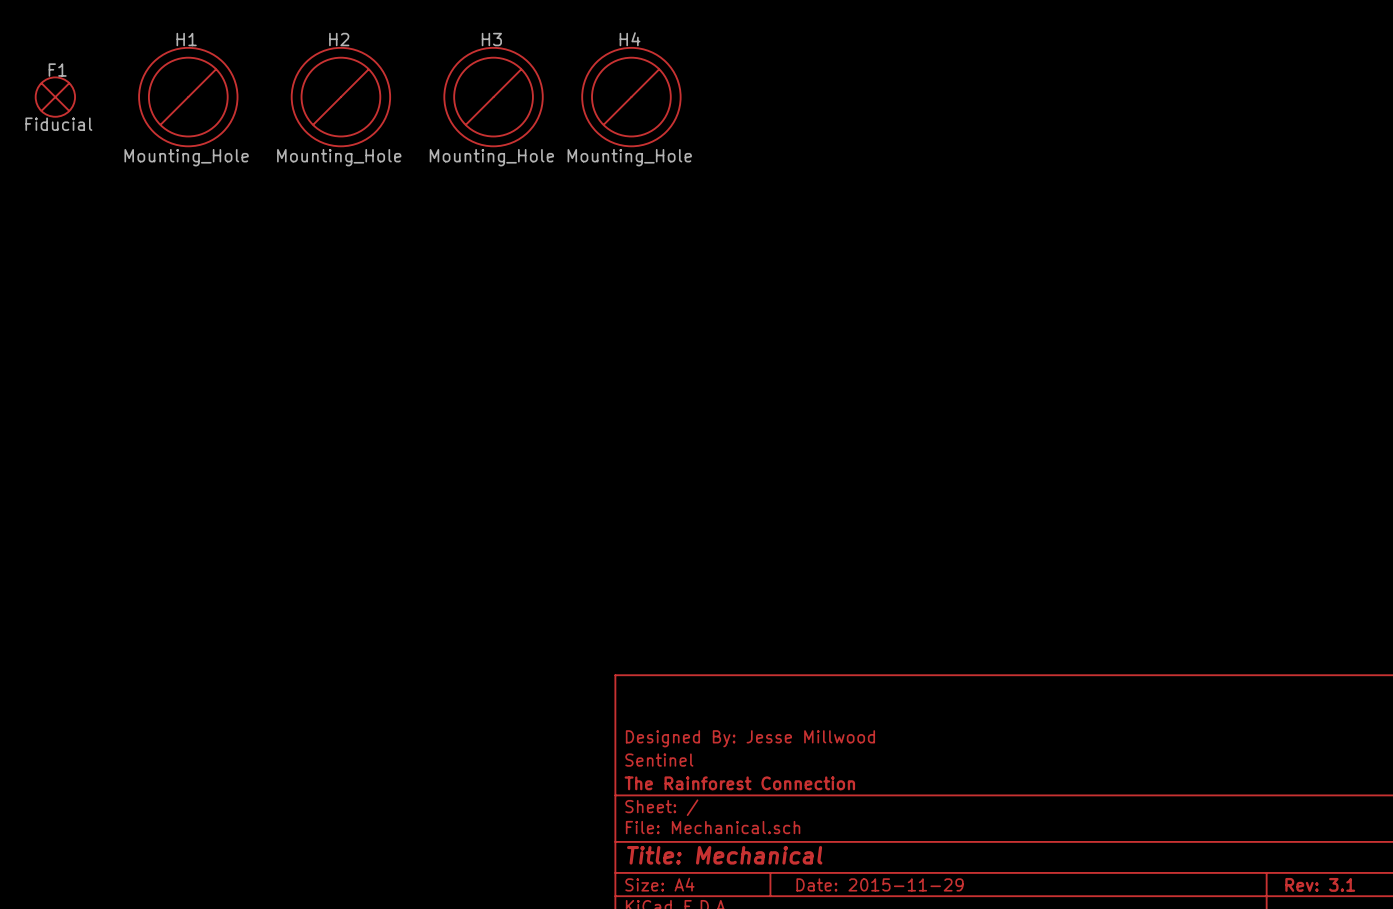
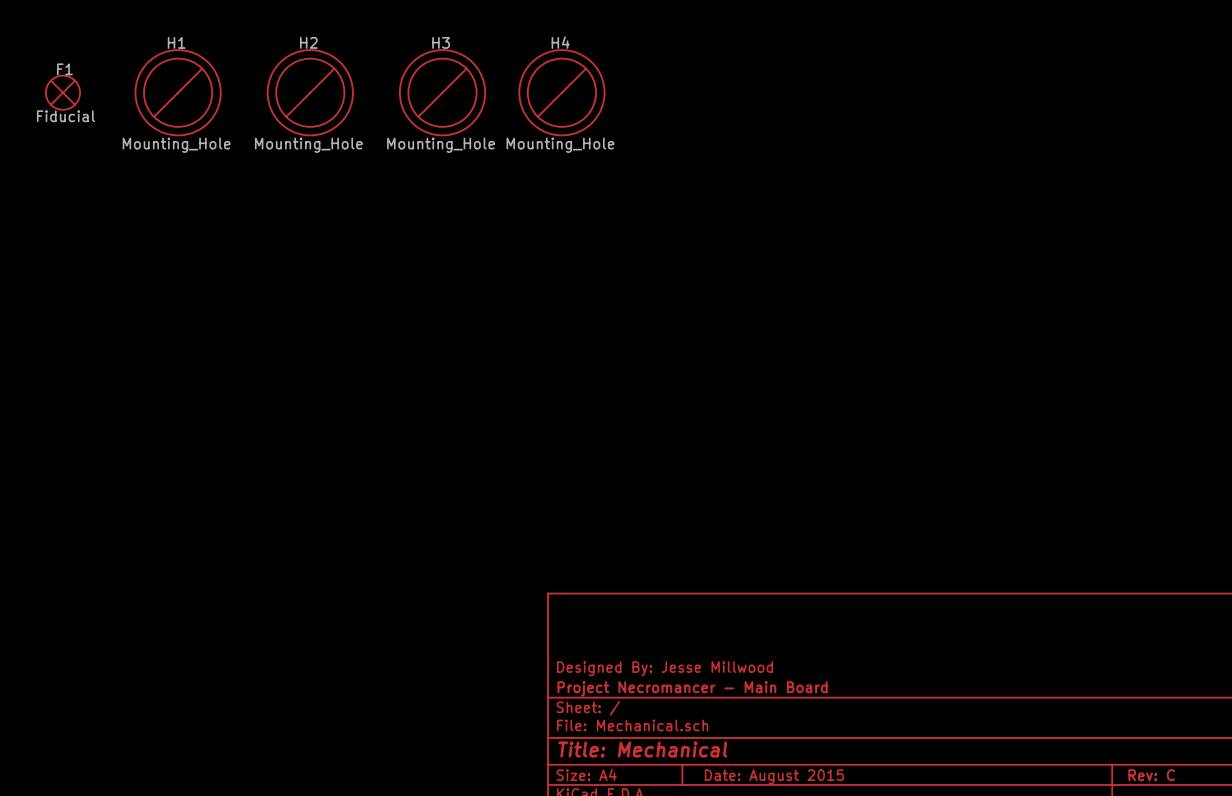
title block: Designed By: Jesse Millwood (750, 738) -> none
title block: Sentinel (659, 760) -> Designed By: Jesse Millwood (665, 668)
title block: The Rainforest Connection (739, 783) -> Project Necromancer - Main Board (692, 688)
title block: Date: 2015-11-29 (880, 884) -> Date: August 2015 (774, 776)
title block: Rev: 3.1 (1320, 884) -> Rev: C (1151, 775)

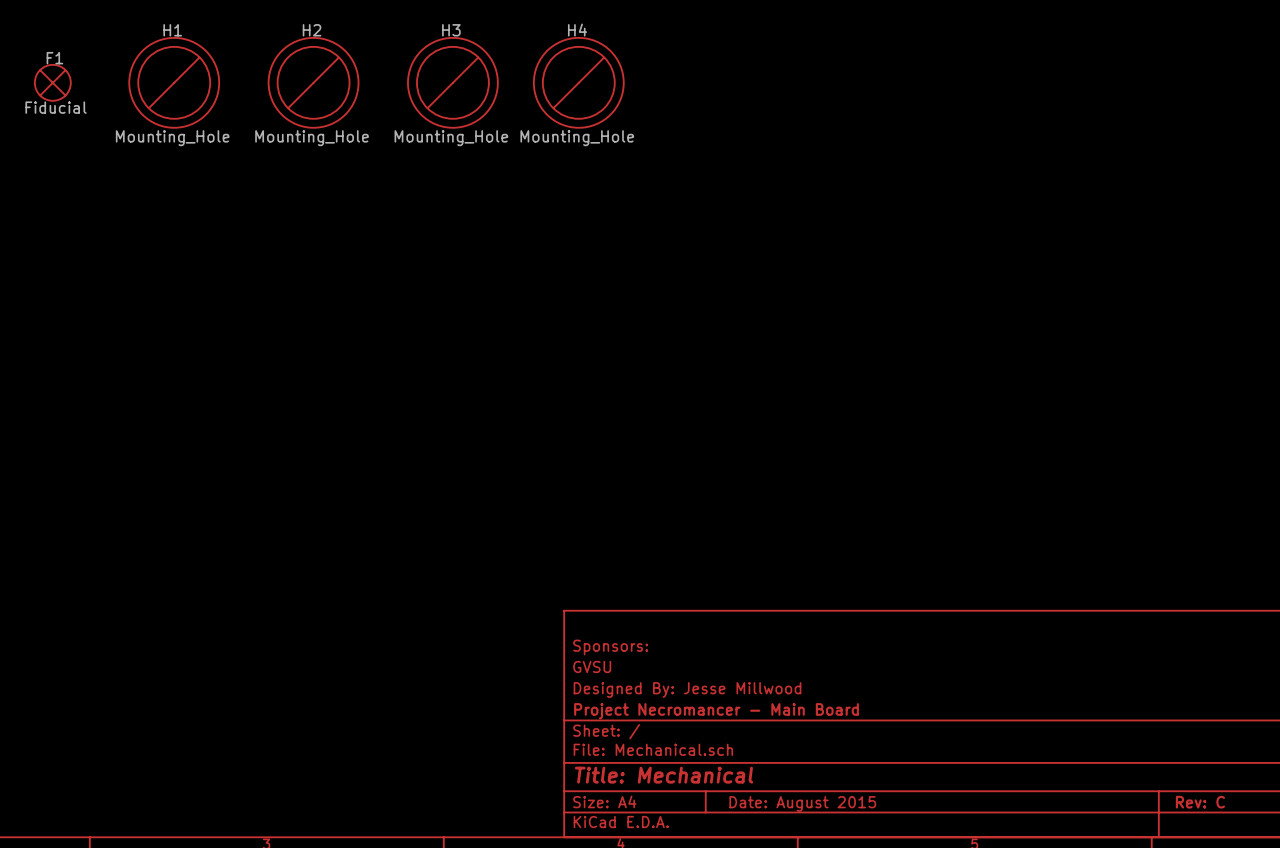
title block: none -> Sponsors: (610, 647)
title block: none -> GVSU (592, 666)

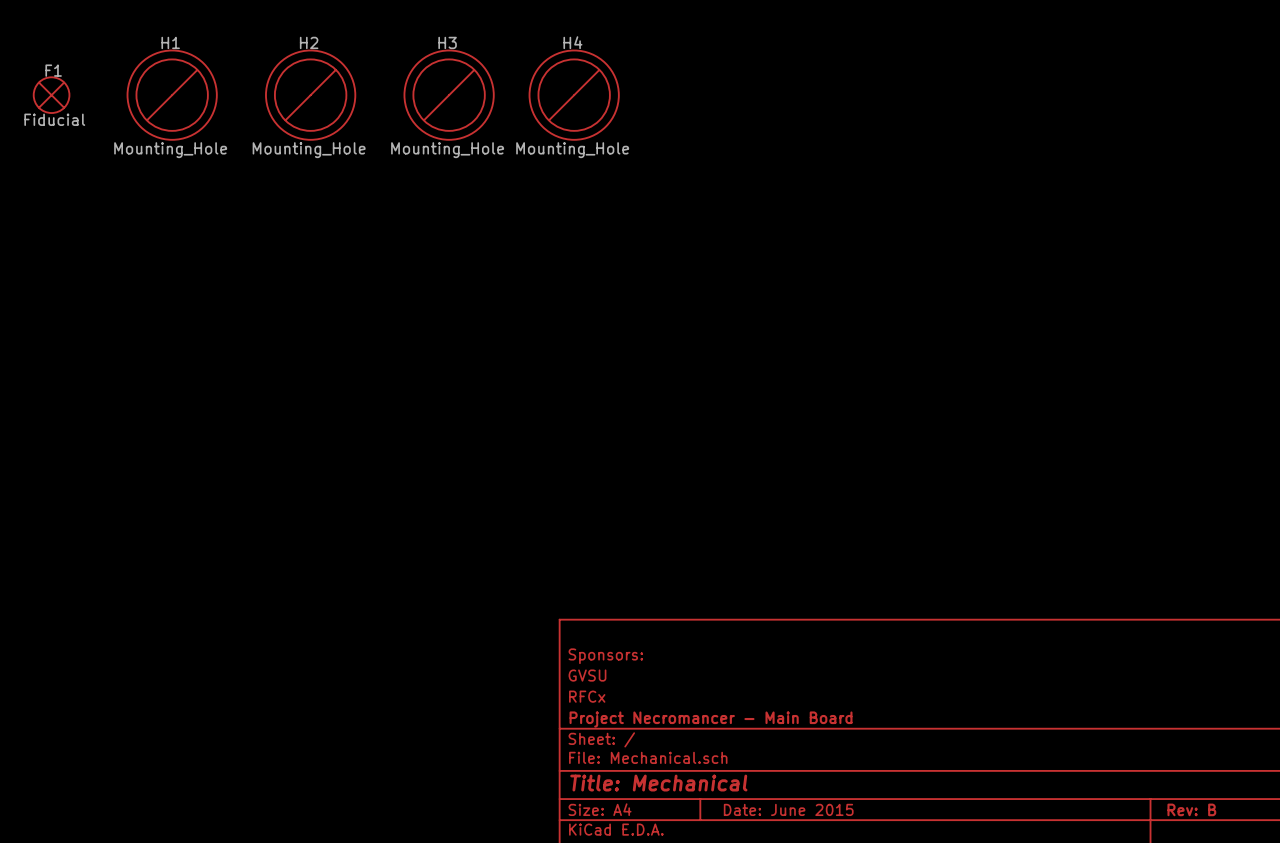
title block: Designed By: Jesse Millwood (687, 689) -> RFCx (587, 696)
title block: Rev: C (1200, 802) -> Rev: B (1191, 809)
title block: Date: August 2015 (802, 803) -> Date: June 2015 (788, 809)

